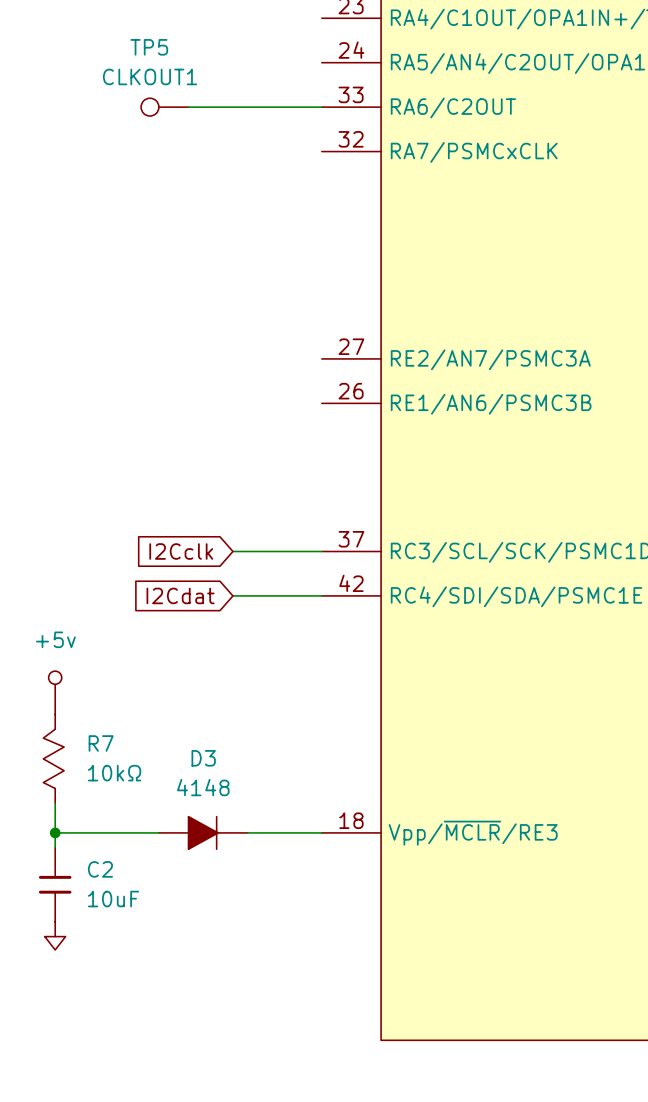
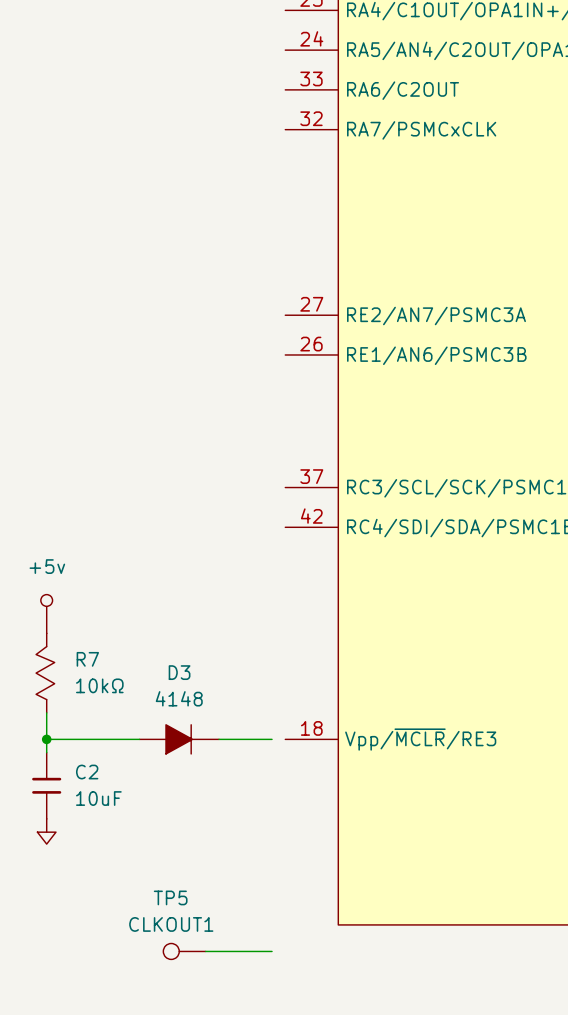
TP5 position: (164, 107) -> (184, 951)
wire: (188, 107) (321, 107) -> none
global label: I2Cclk (181, 551) -> none
wire: (232, 551) (321, 551) -> none
global label: I2Cdat (180, 595) -> none
wire: (232, 595) (321, 595) -> none
wire: (307, 832) (321, 832) -> none
wire: none -> (205, 951) (272, 951)

